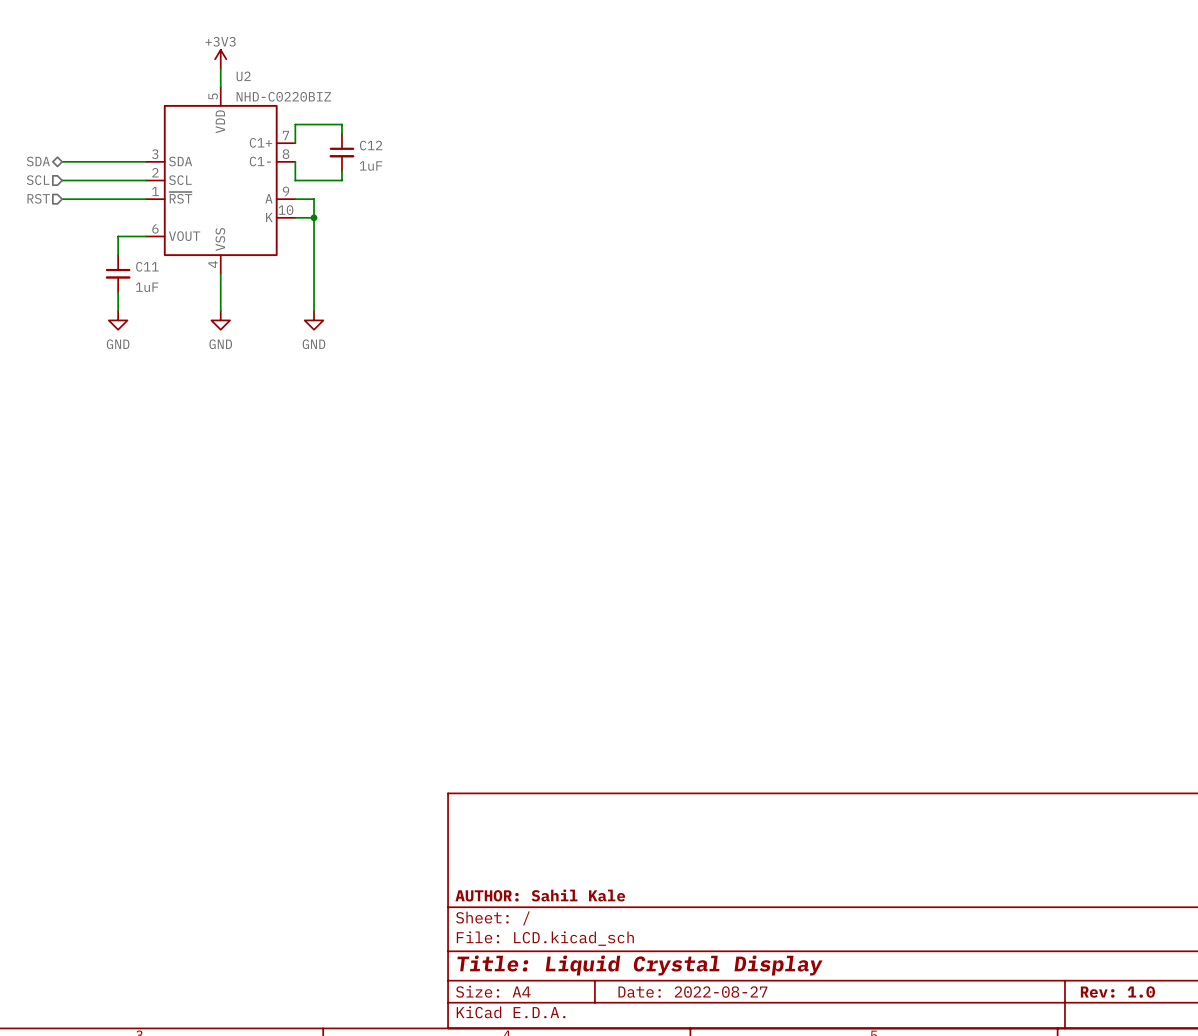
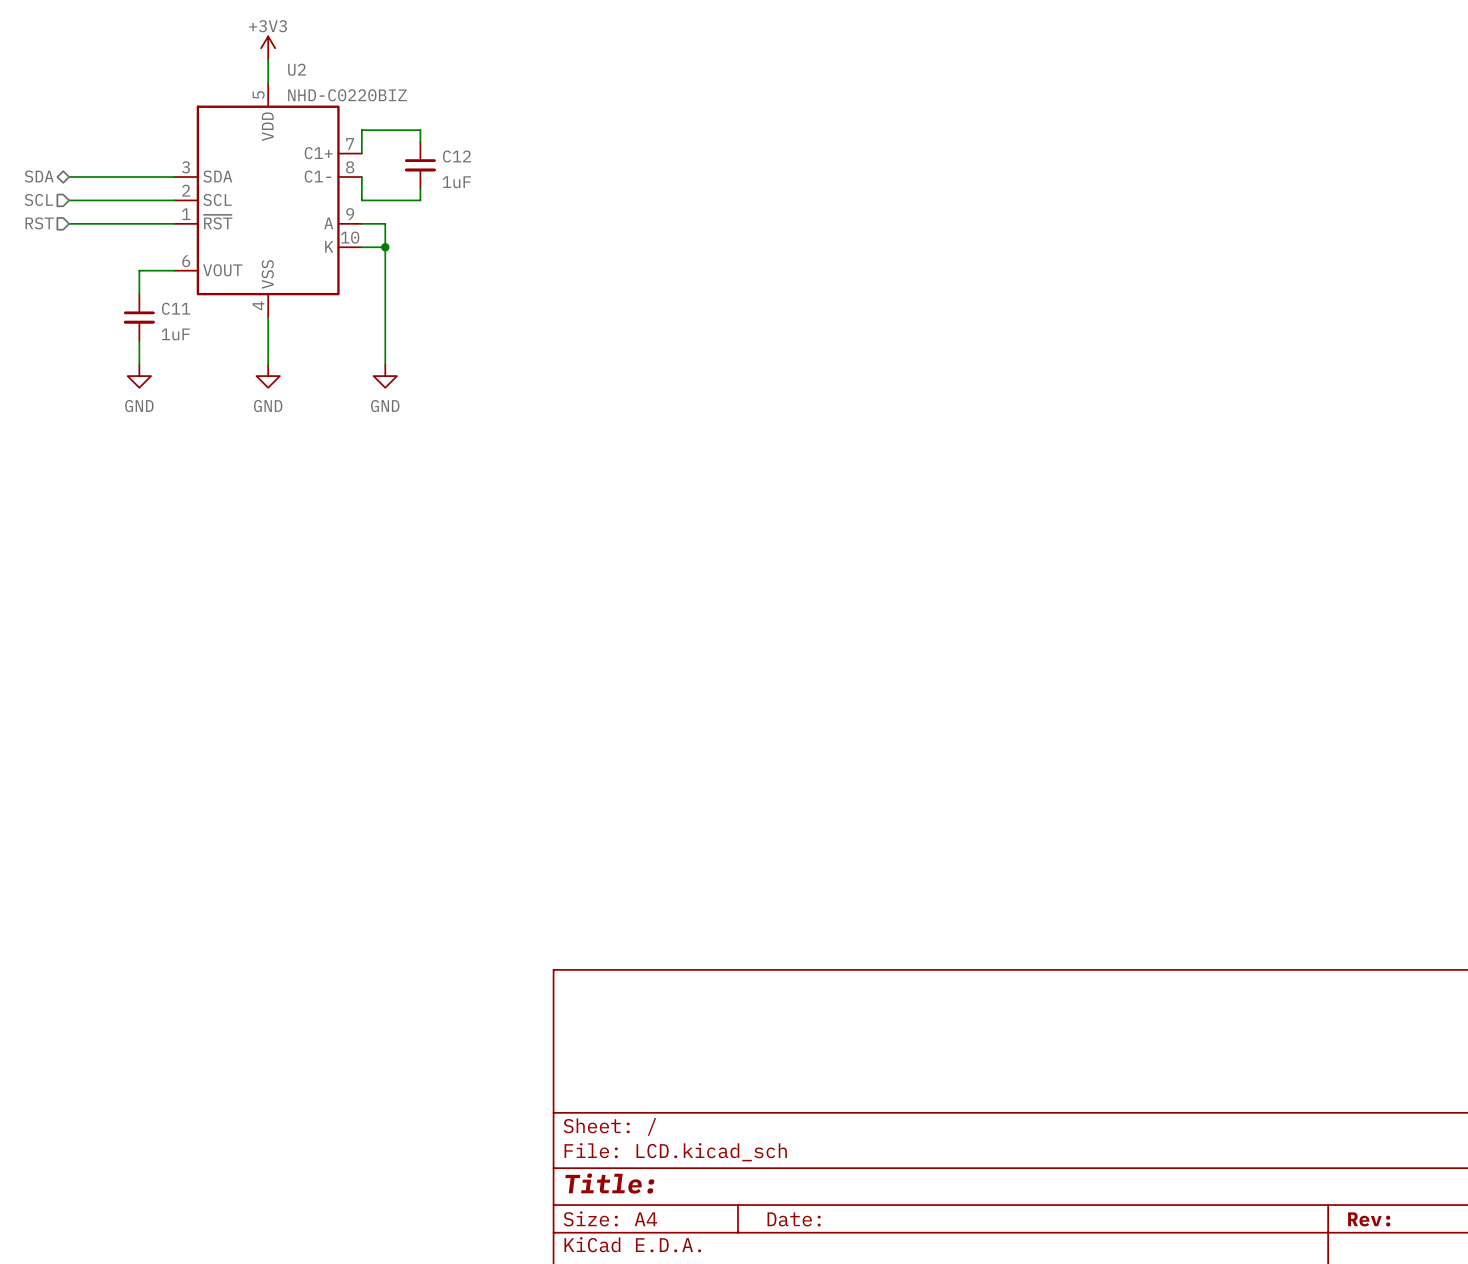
title block: AUTHOR: Sahil Kale (540, 895) -> none
title block: Title: Liquid Crystal Display (639, 965) -> Title: (609, 1183)
title block: Date: 2022-08-27 (692, 992) -> Date: (794, 1219)
title block: Rev: 1.0 (1117, 992) -> Rev: (1369, 1219)

